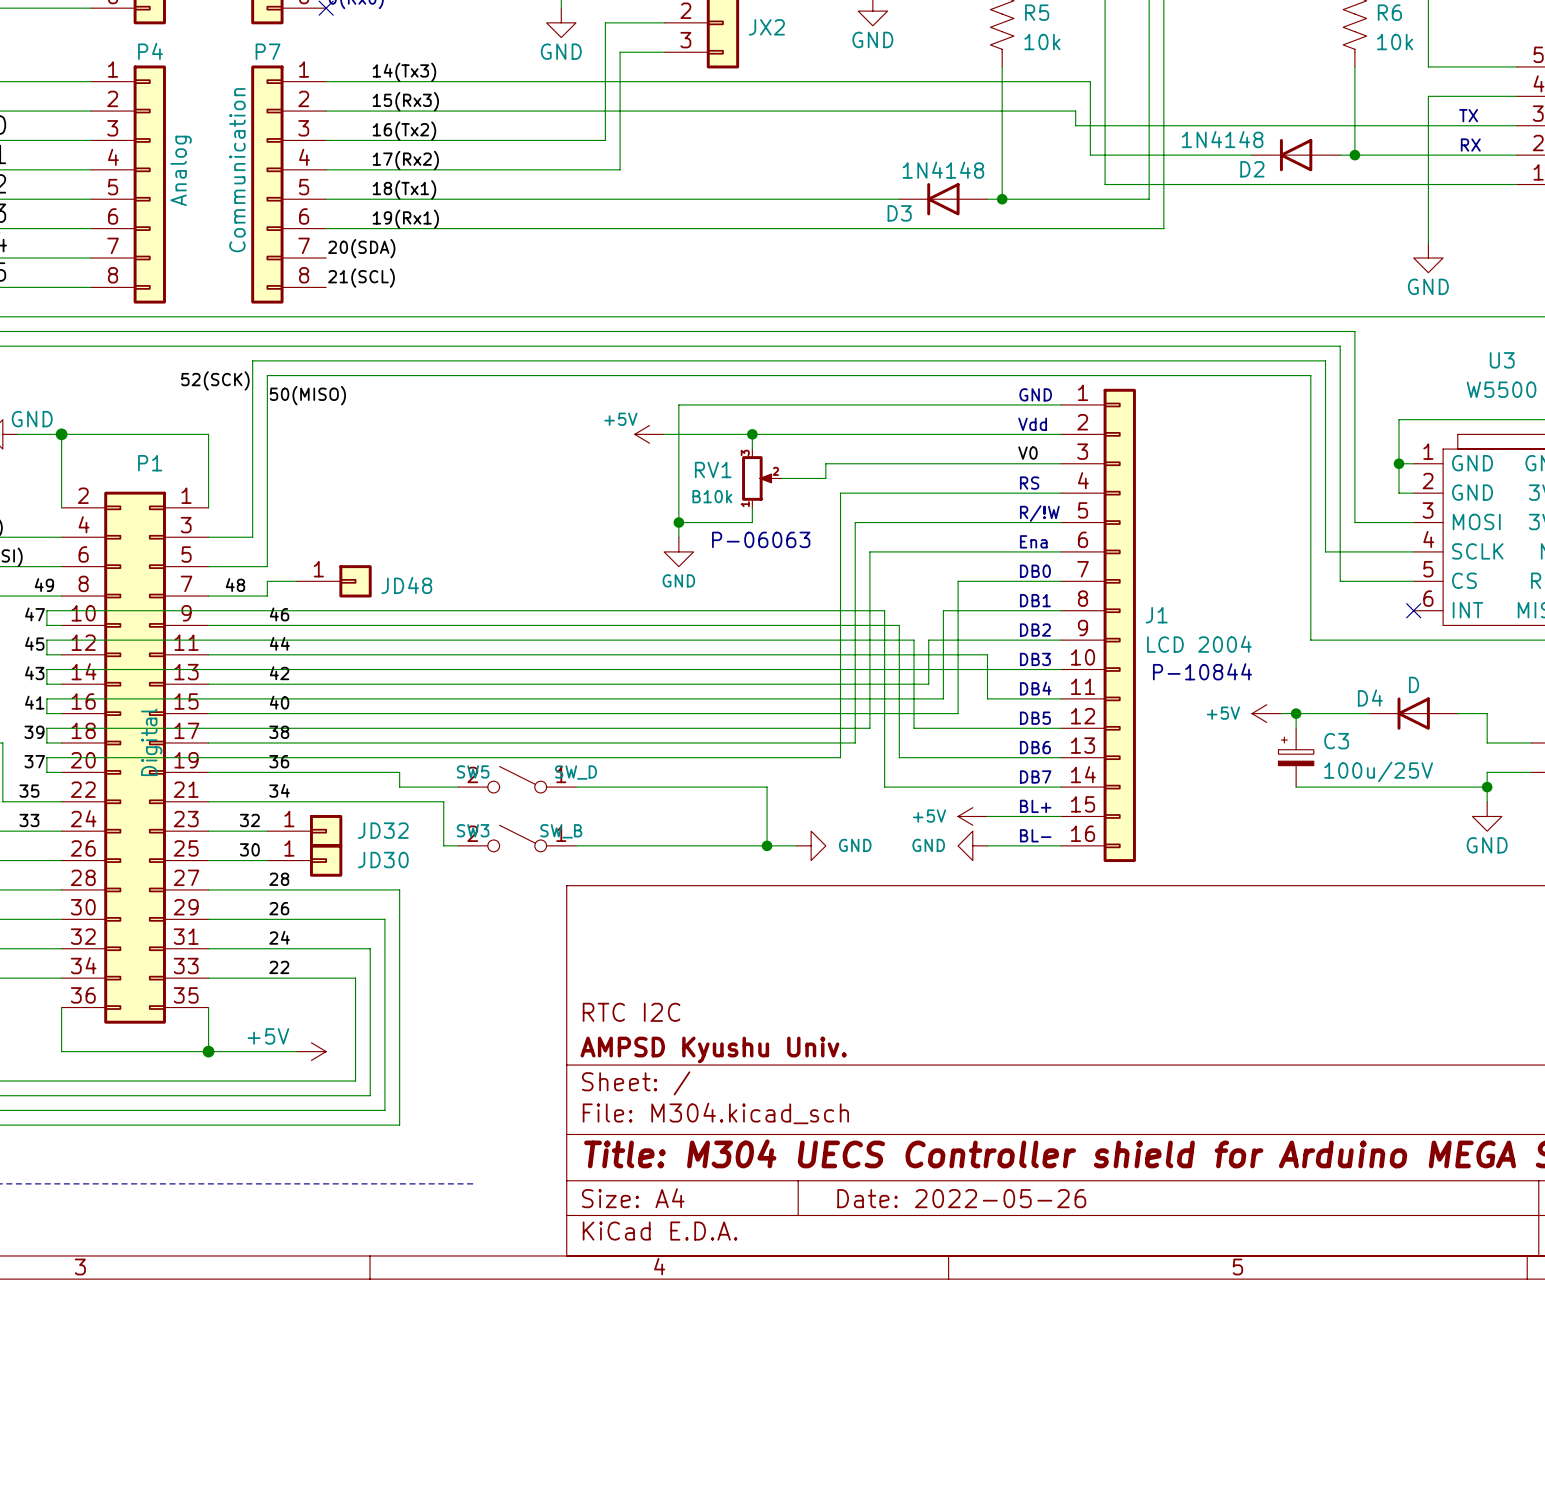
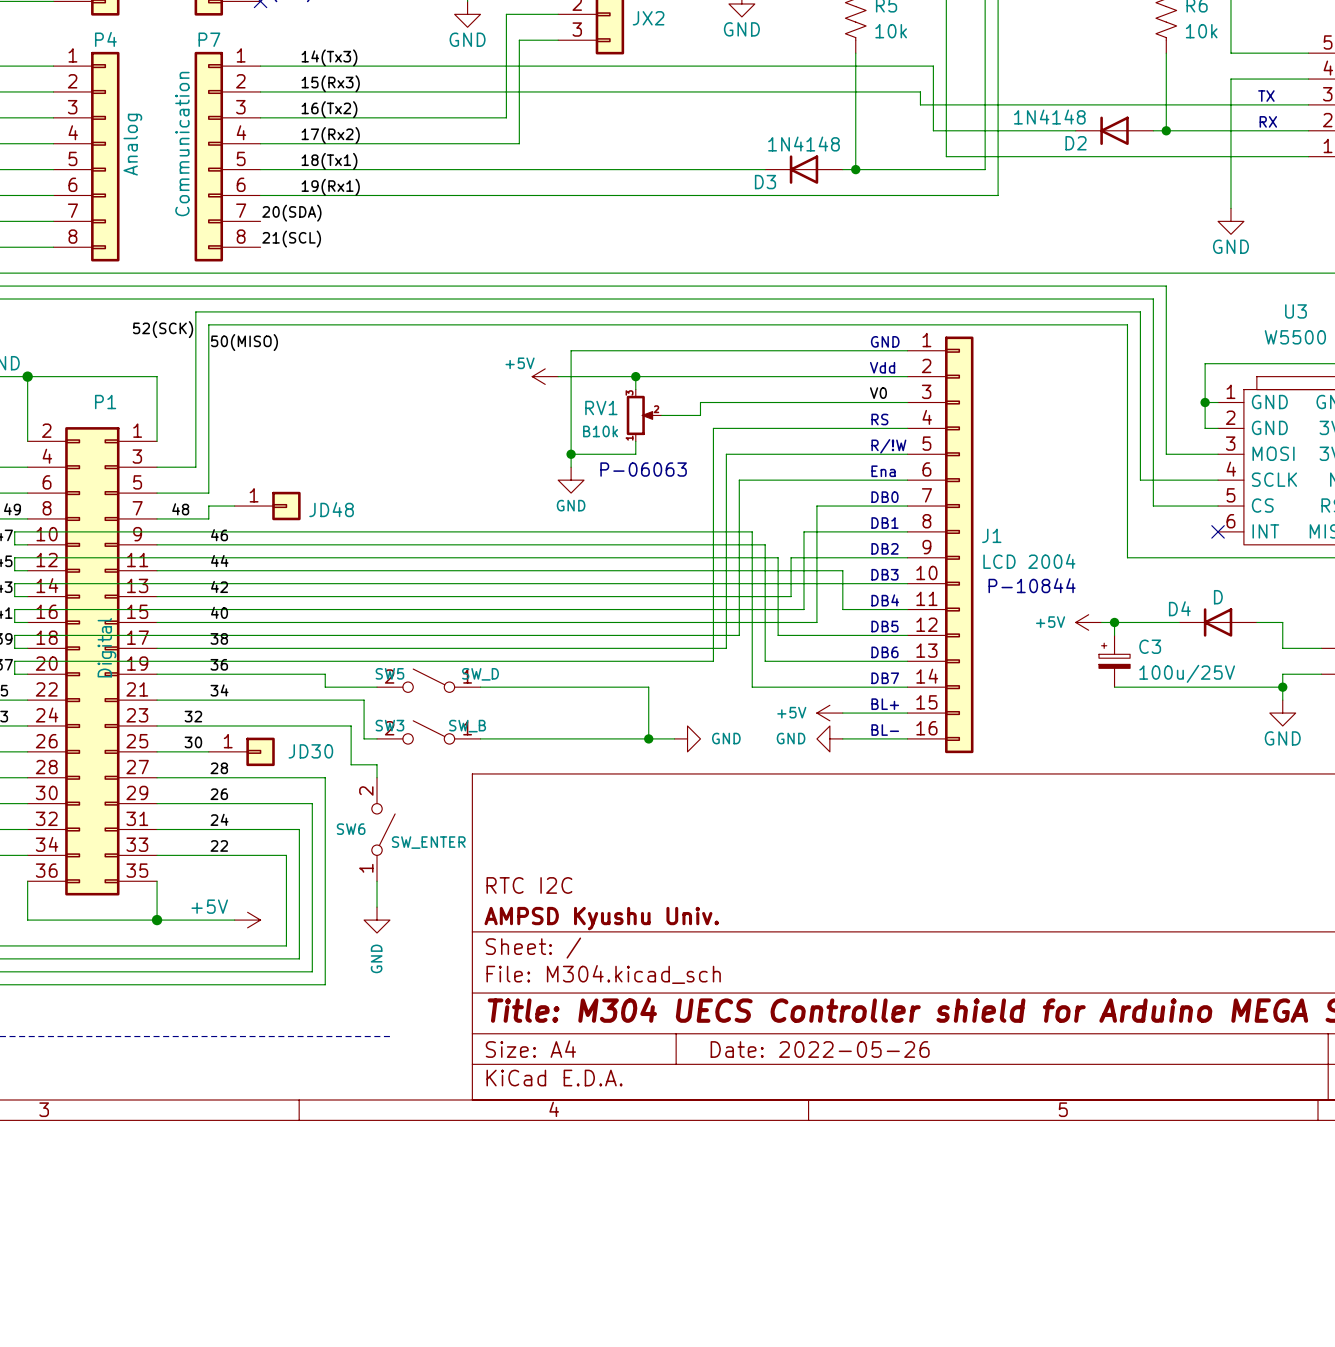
wire: none -> (208, 725) (351, 725) (351, 764) (377, 764) (377, 777)
JD32: (304, 831) -> none
SW6: none -> SW_ENTER (383, 829)
wire: none -> (377, 881) (377, 907)
power symbol: none -> GND (377, 920)

